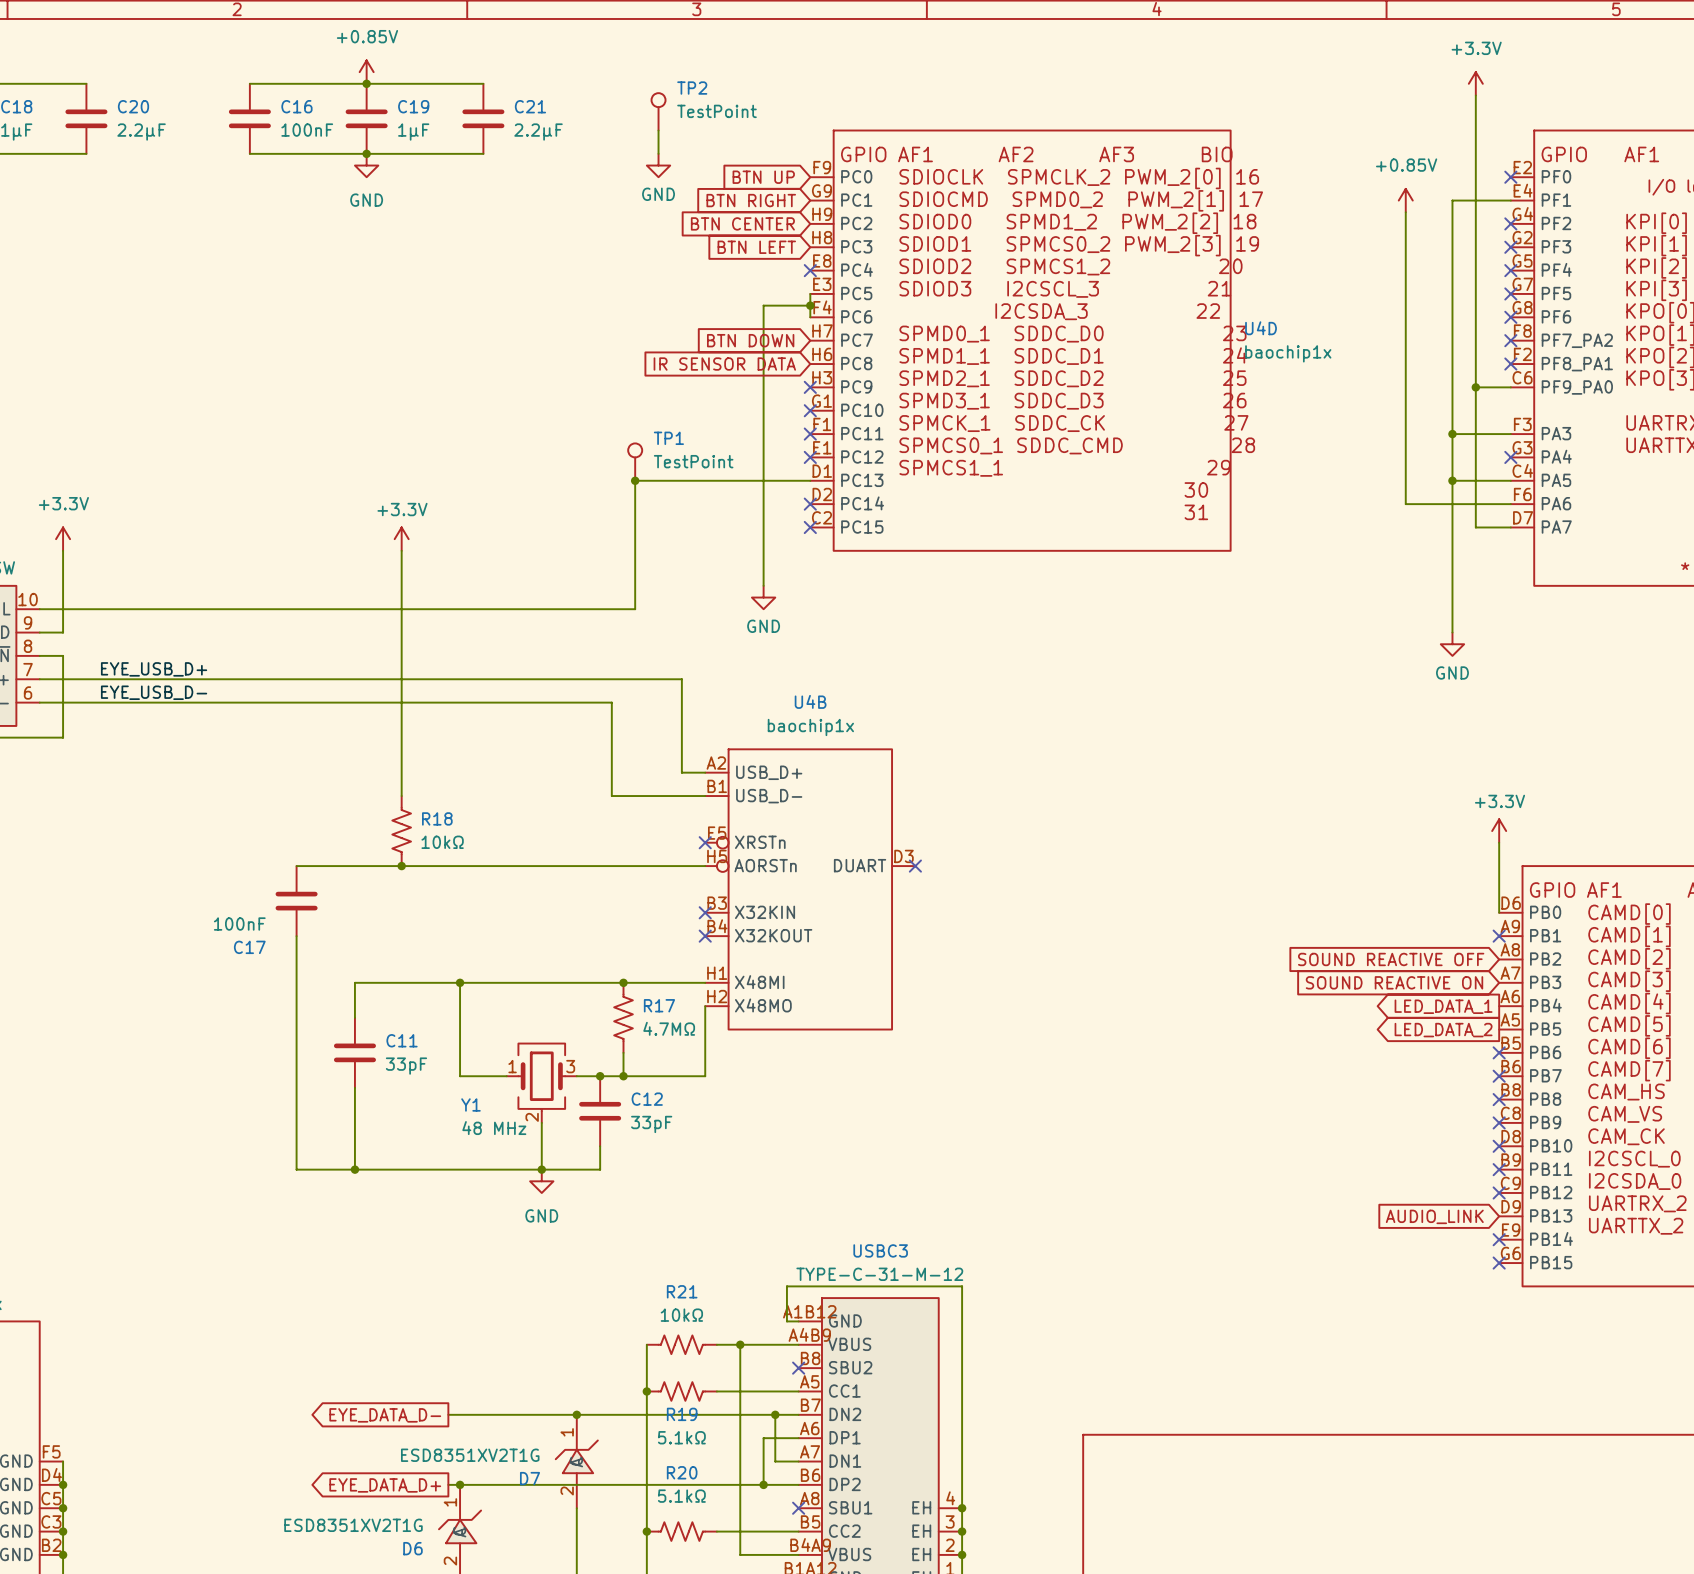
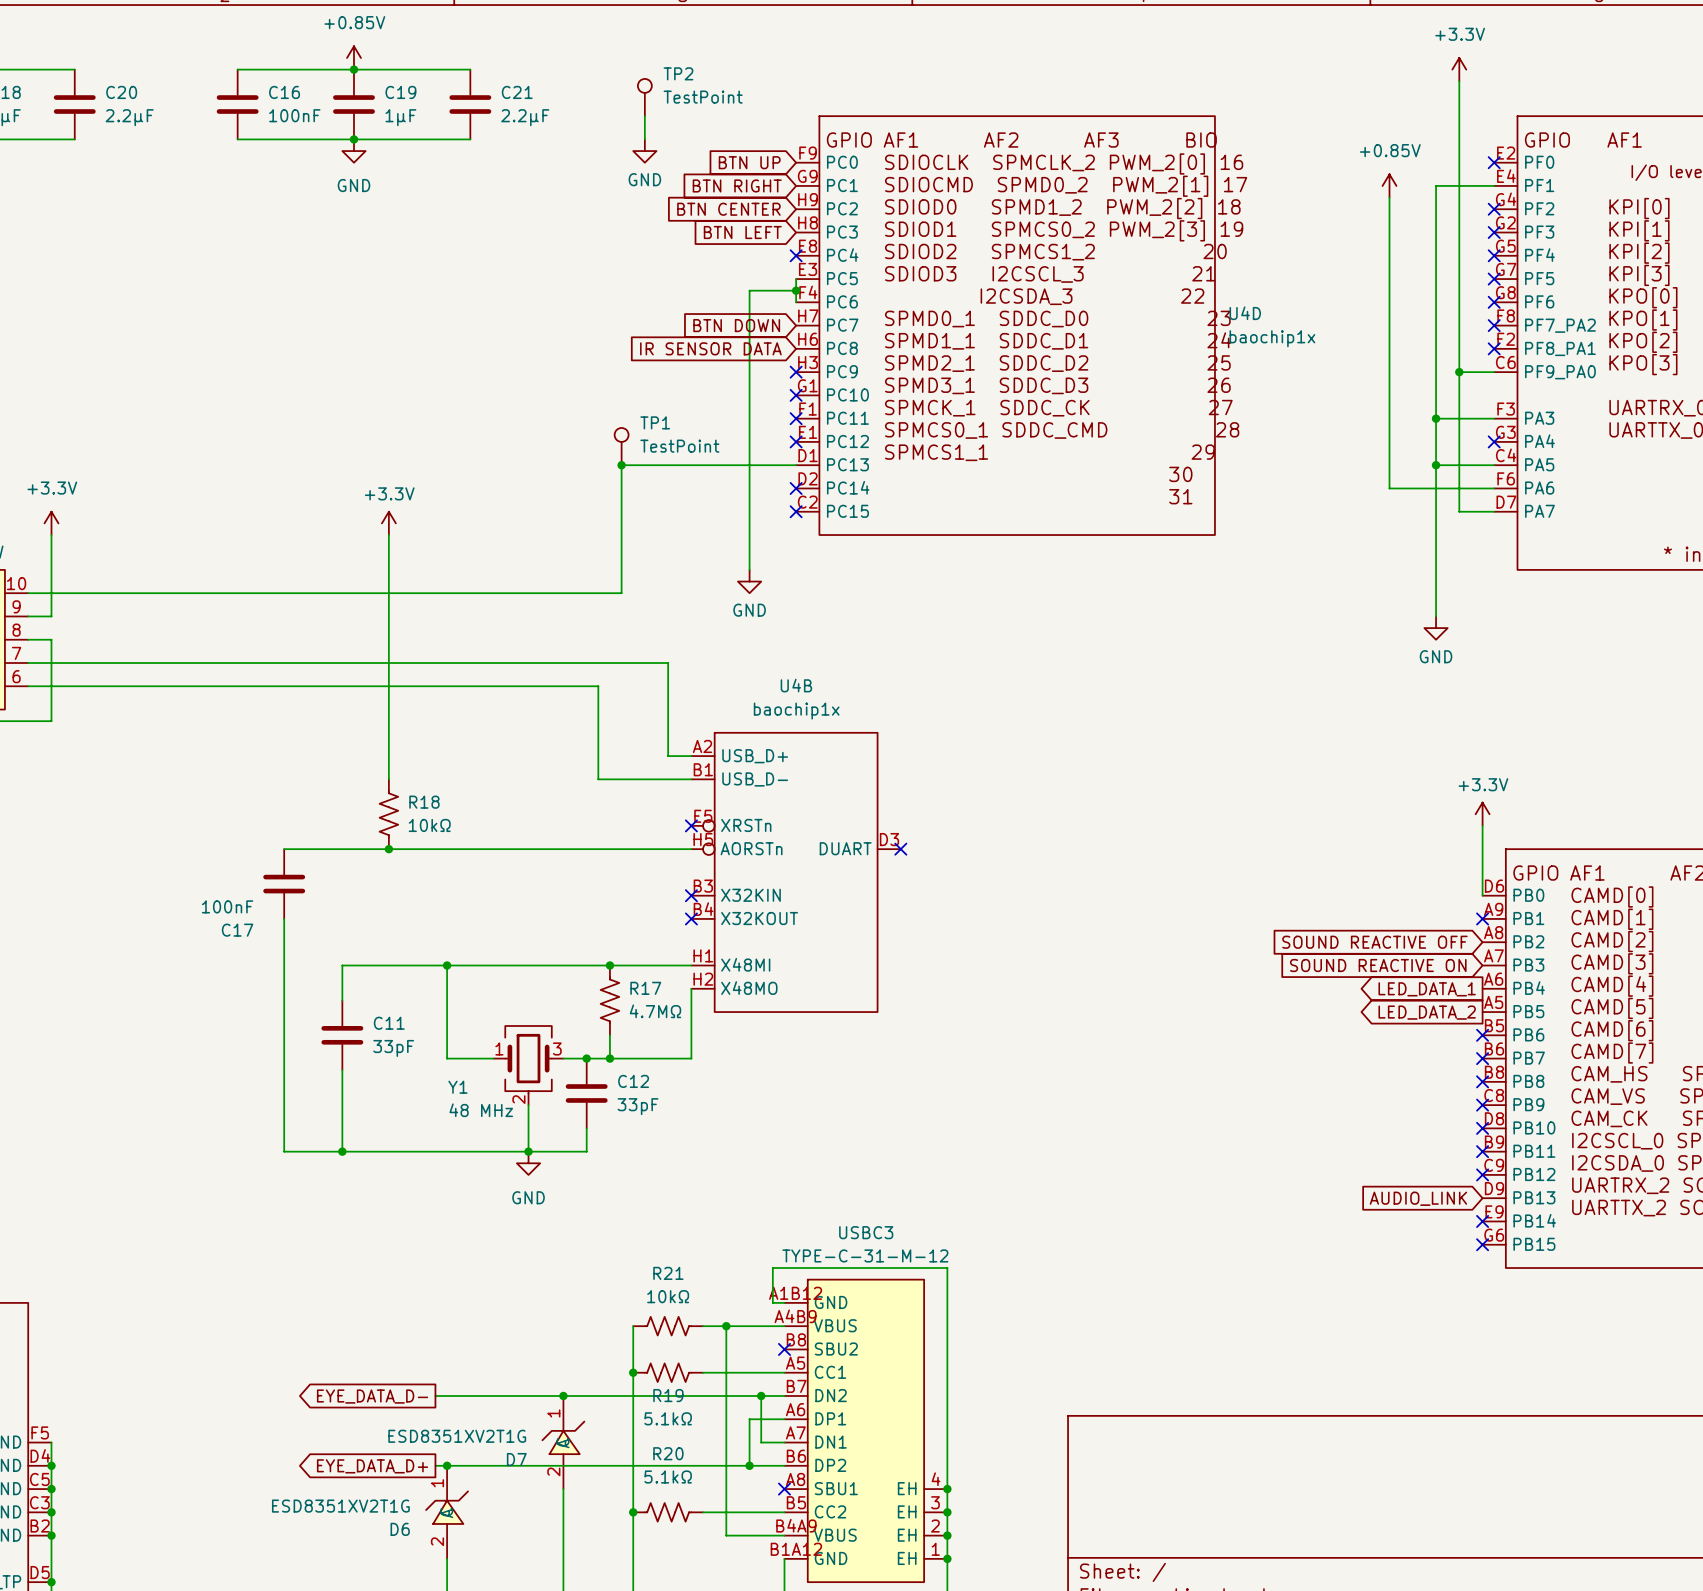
label: EYE_USB_D+ (154, 669) -> none
label: EYE_USB_D- (154, 692) -> none

